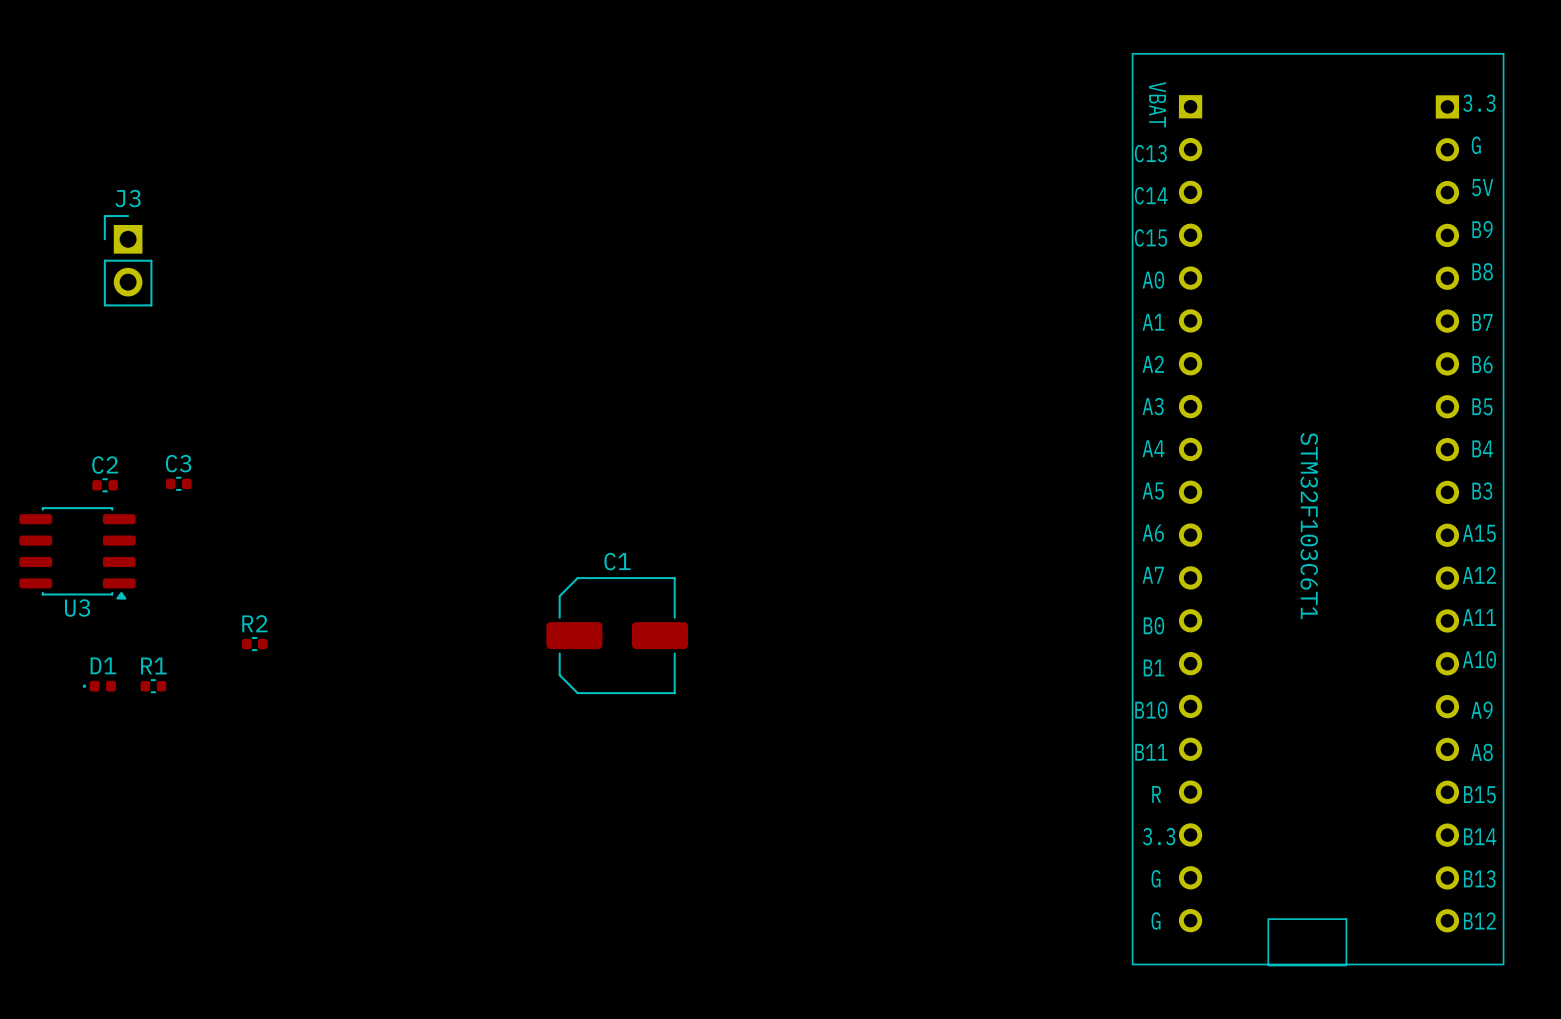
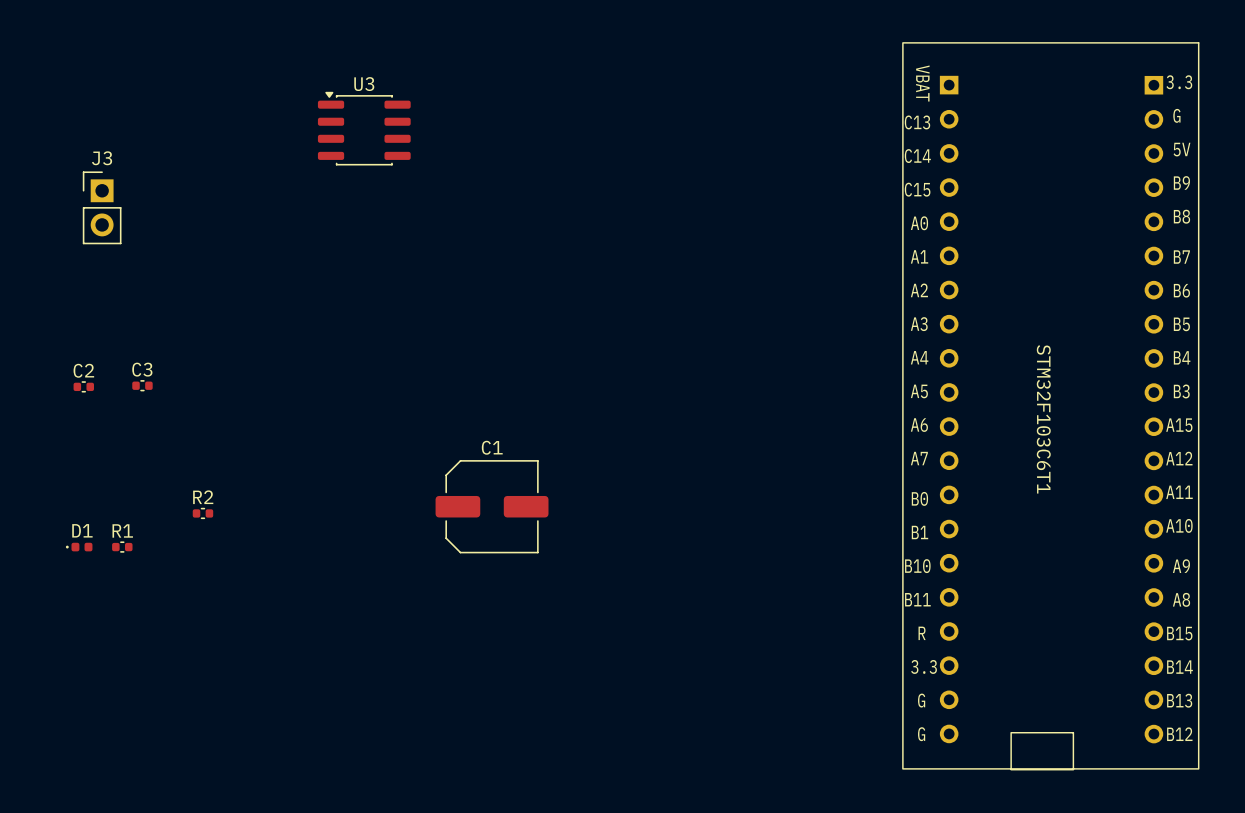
U3 rotation: 0° (77, 553) -> 180° (364, 128)
U3 position: (77, 553) -> (364, 128)

